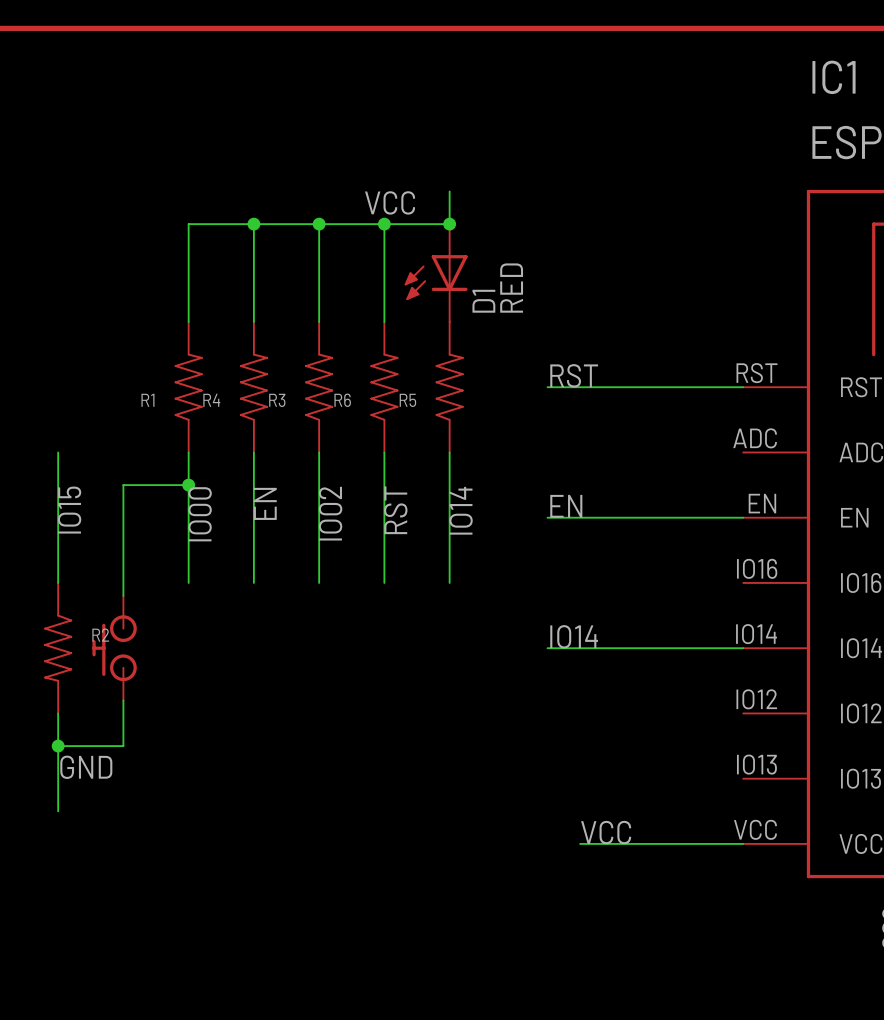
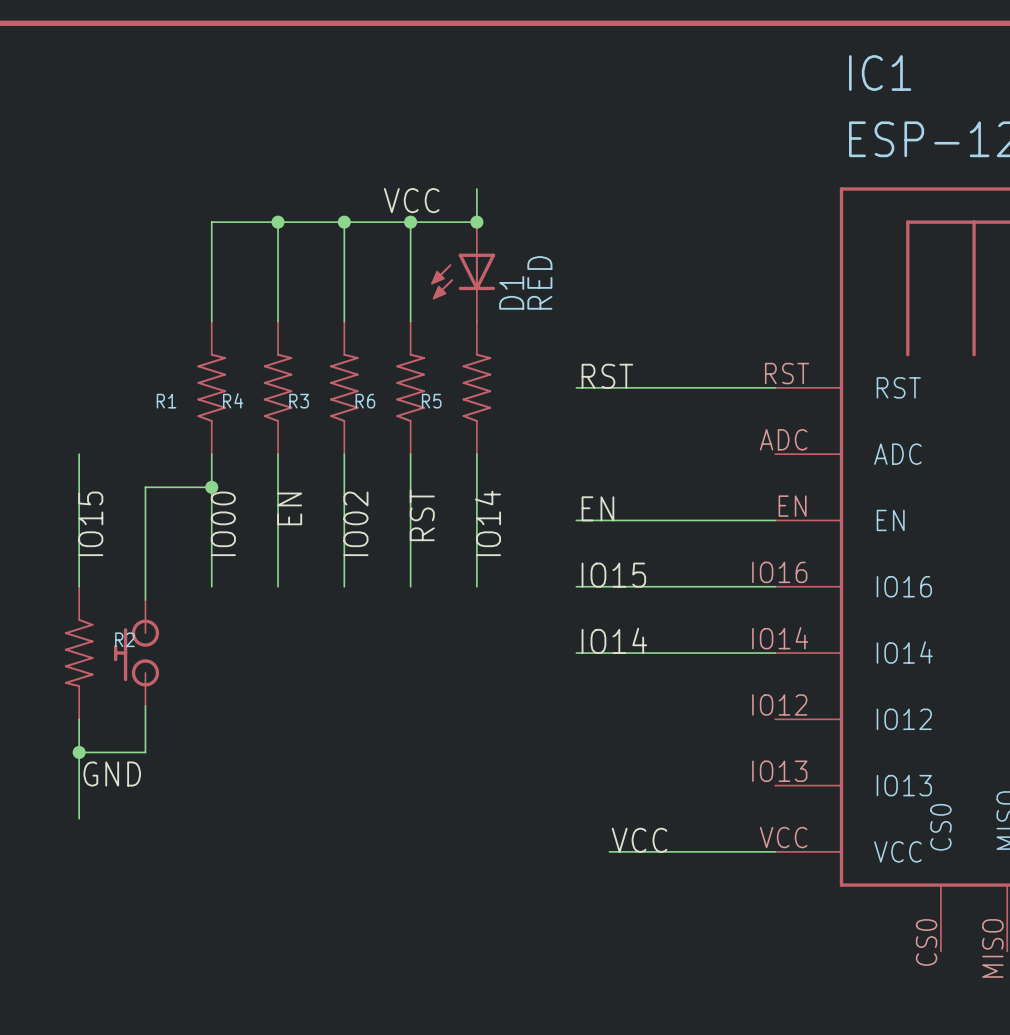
label: none -> IO15 (613, 575)
wire: none -> (576, 586) (775, 586)

